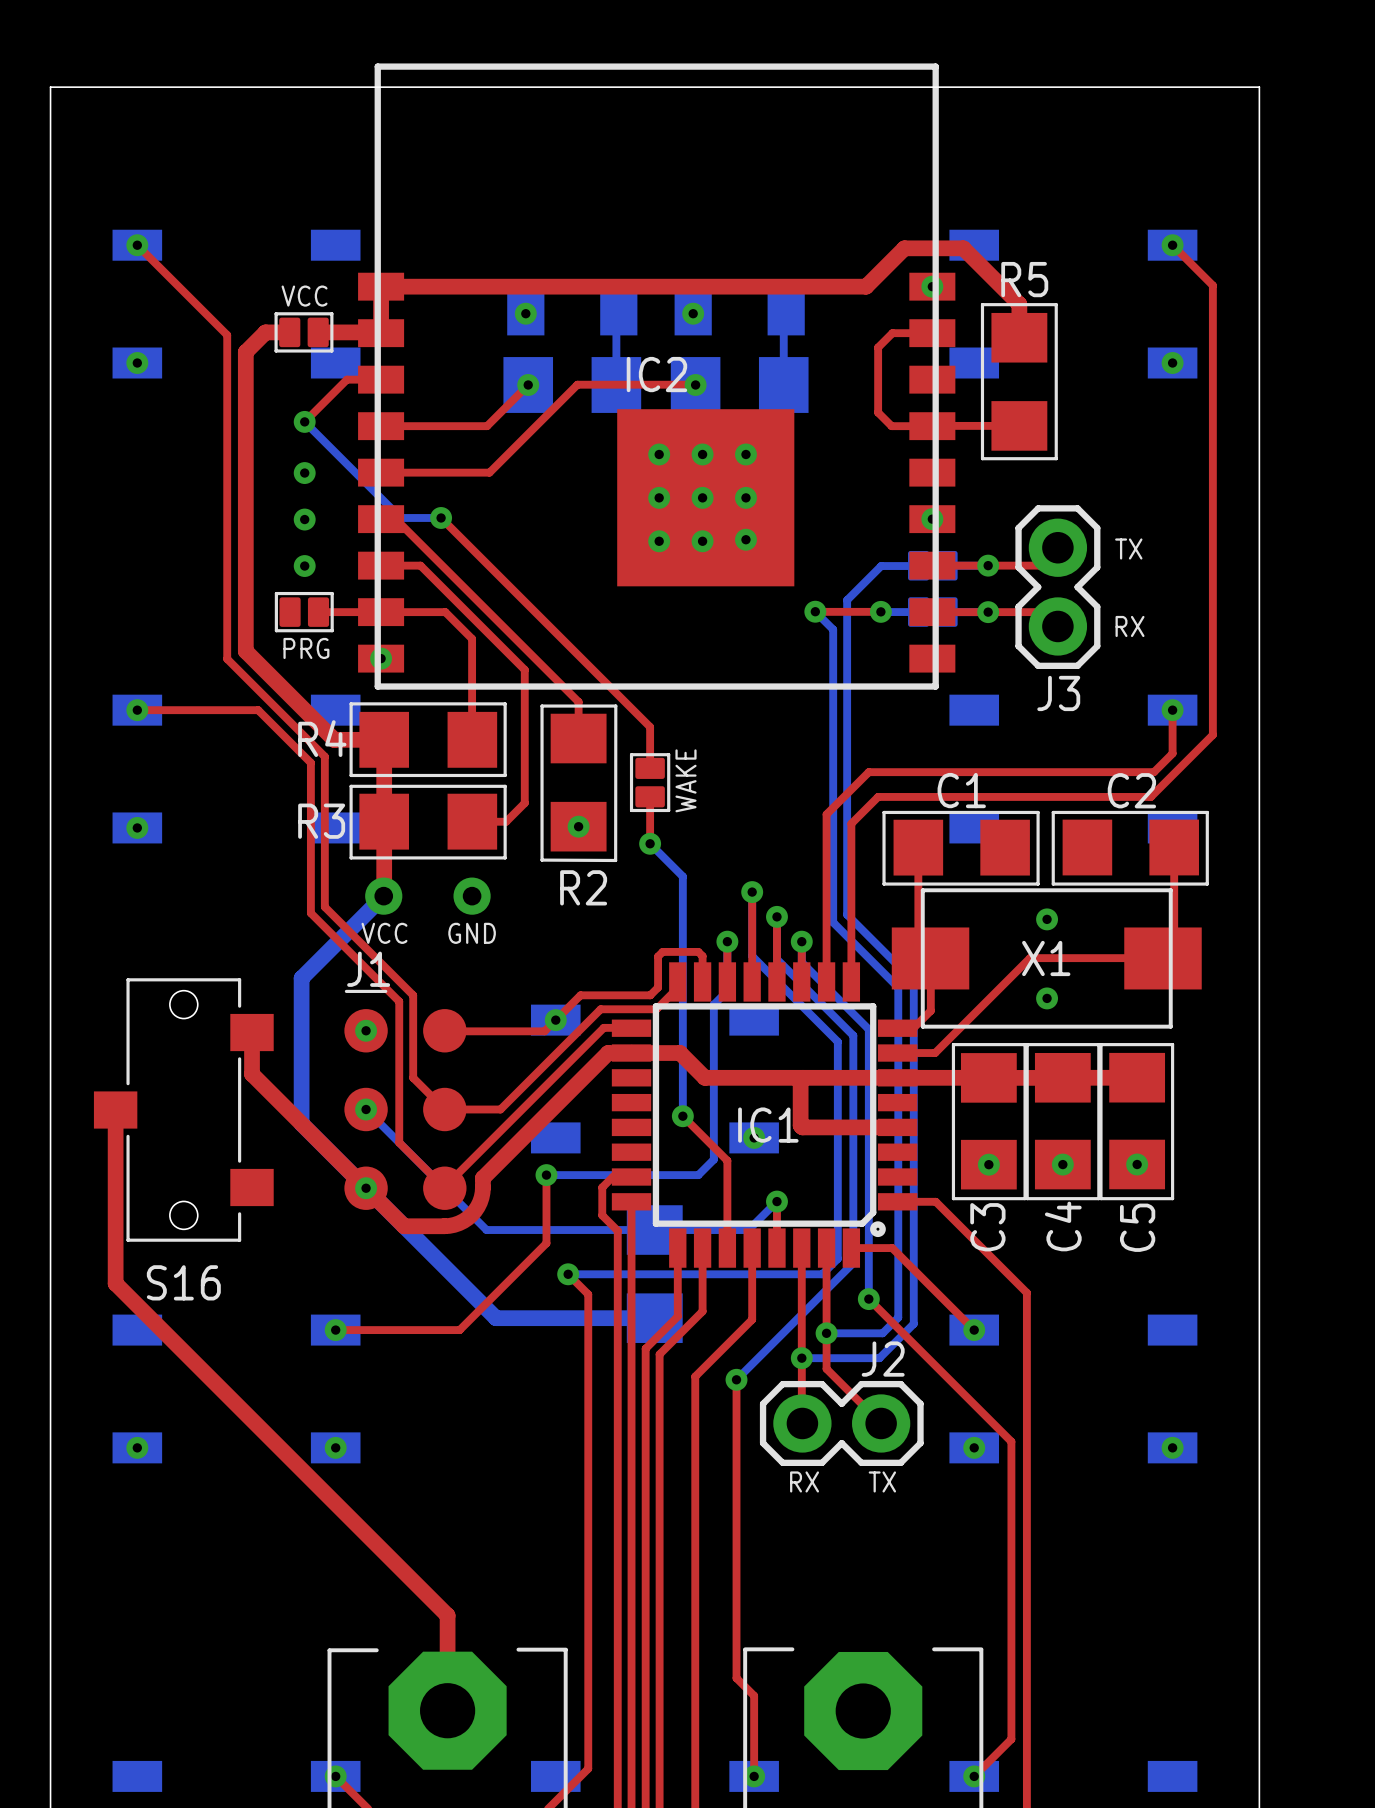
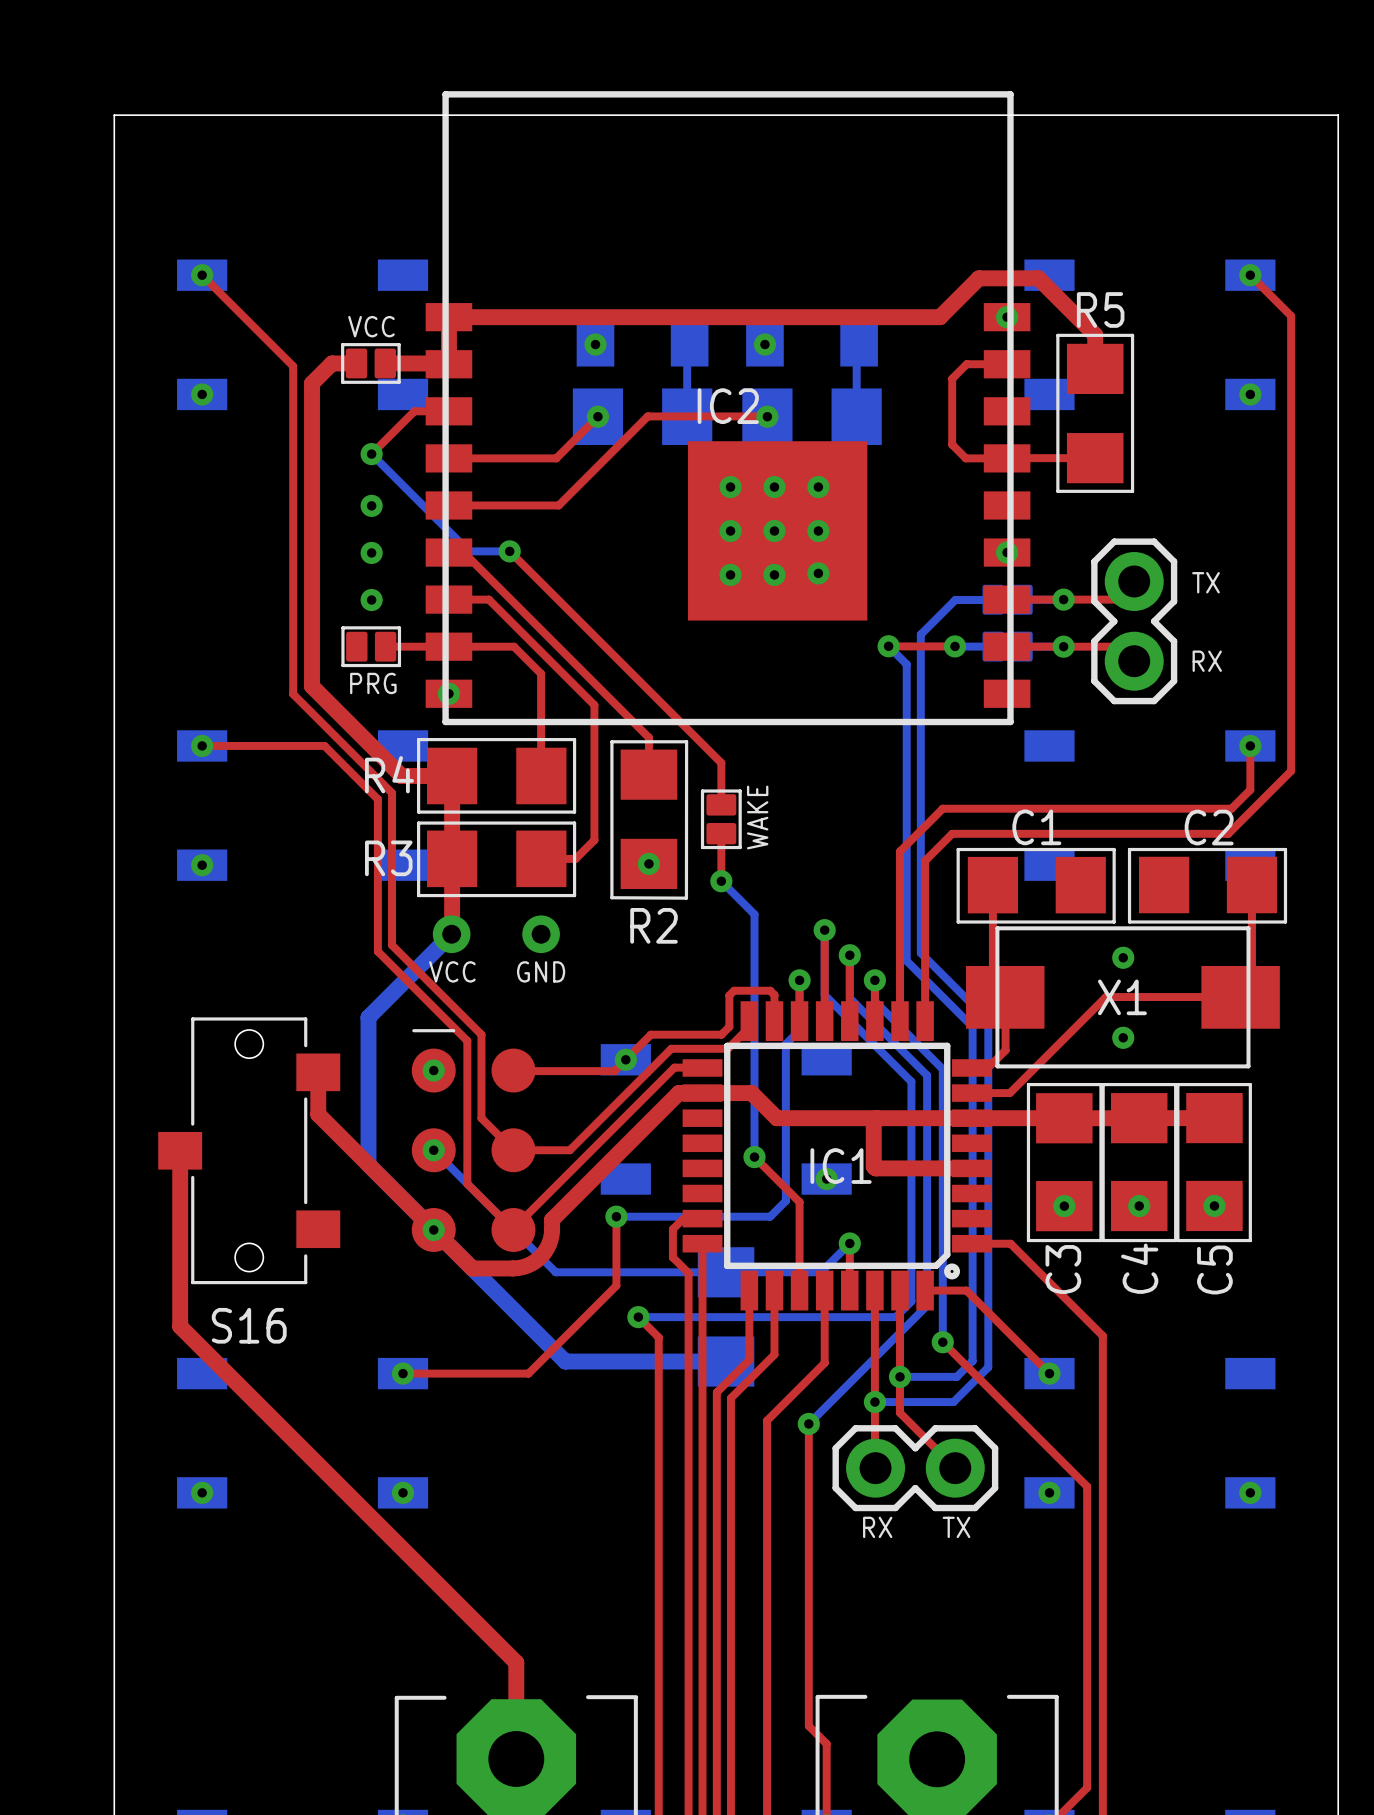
J3 name: J3 (1058, 693) -> none
J1 name: J1 (368, 969) -> none
J2 name: J2 (883, 1359) -> none

